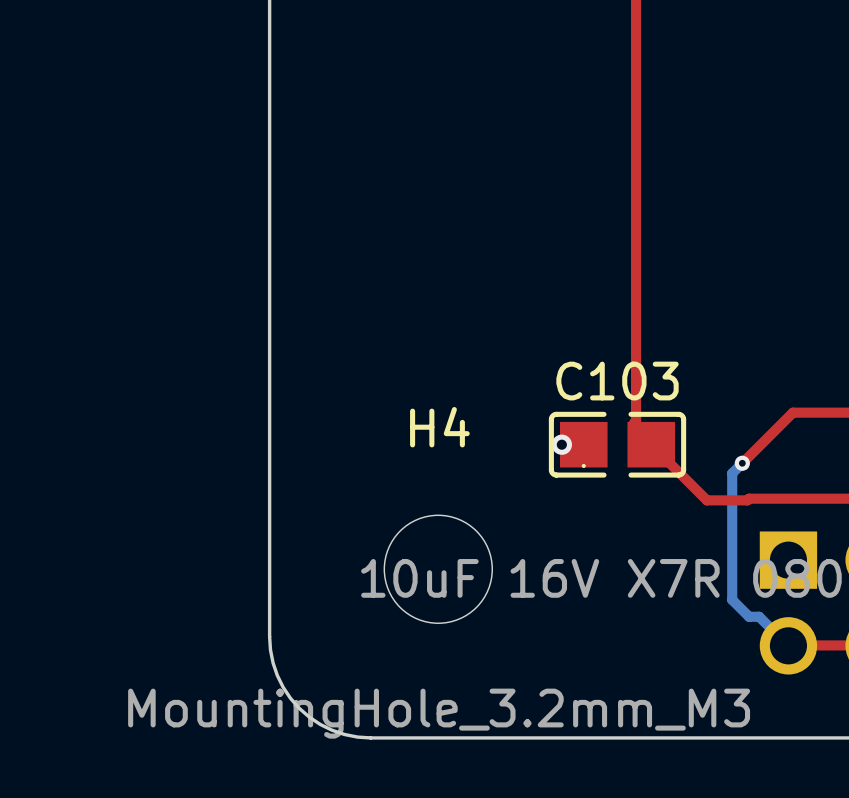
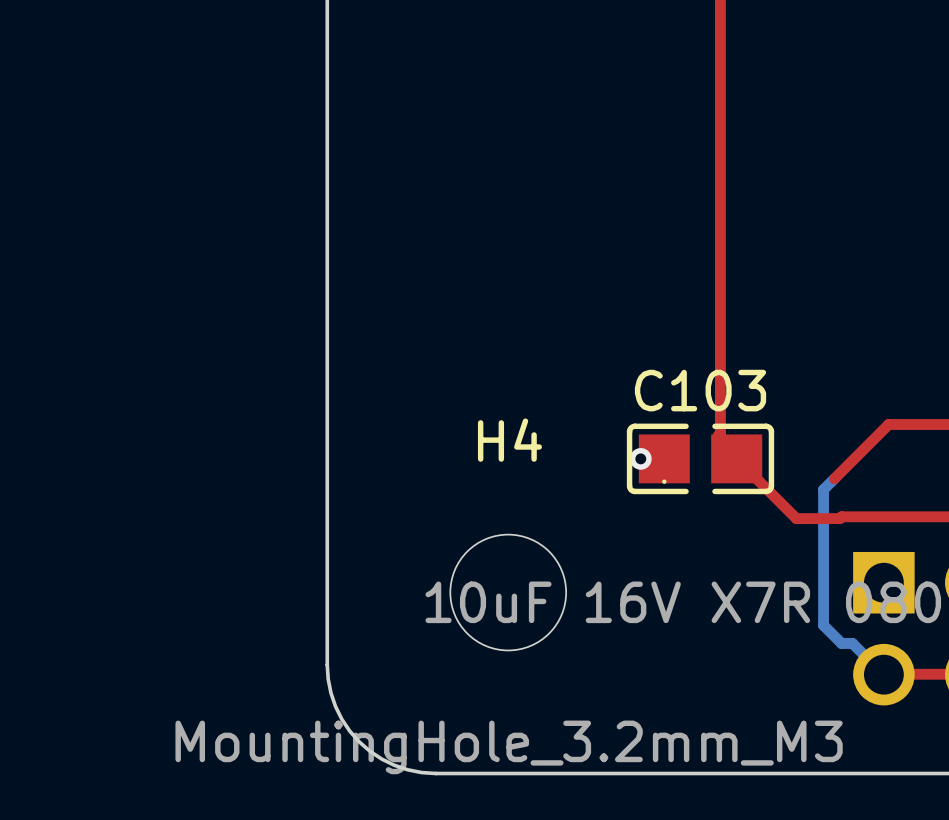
via: (742, 463) -> none

